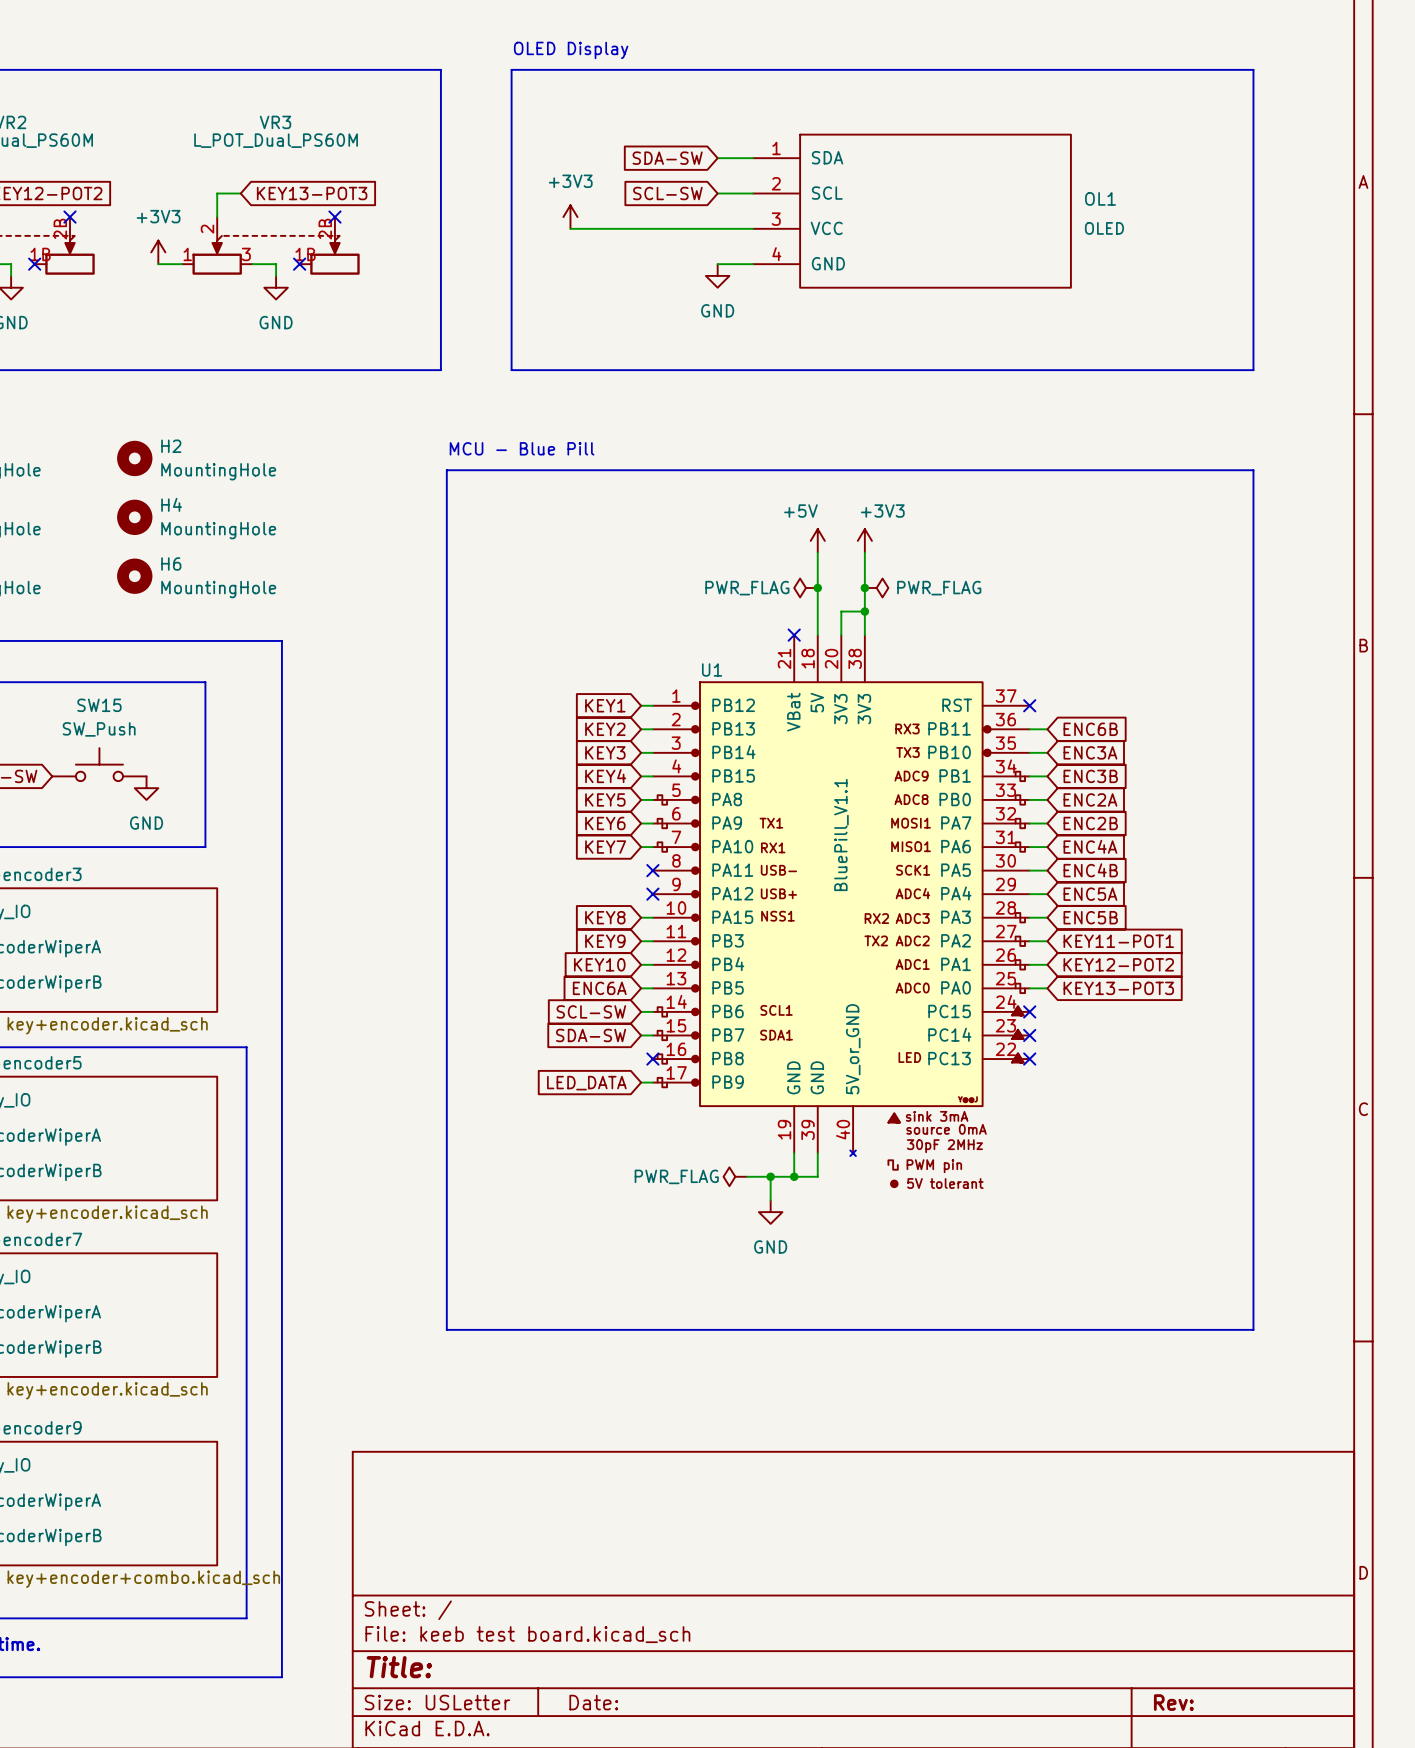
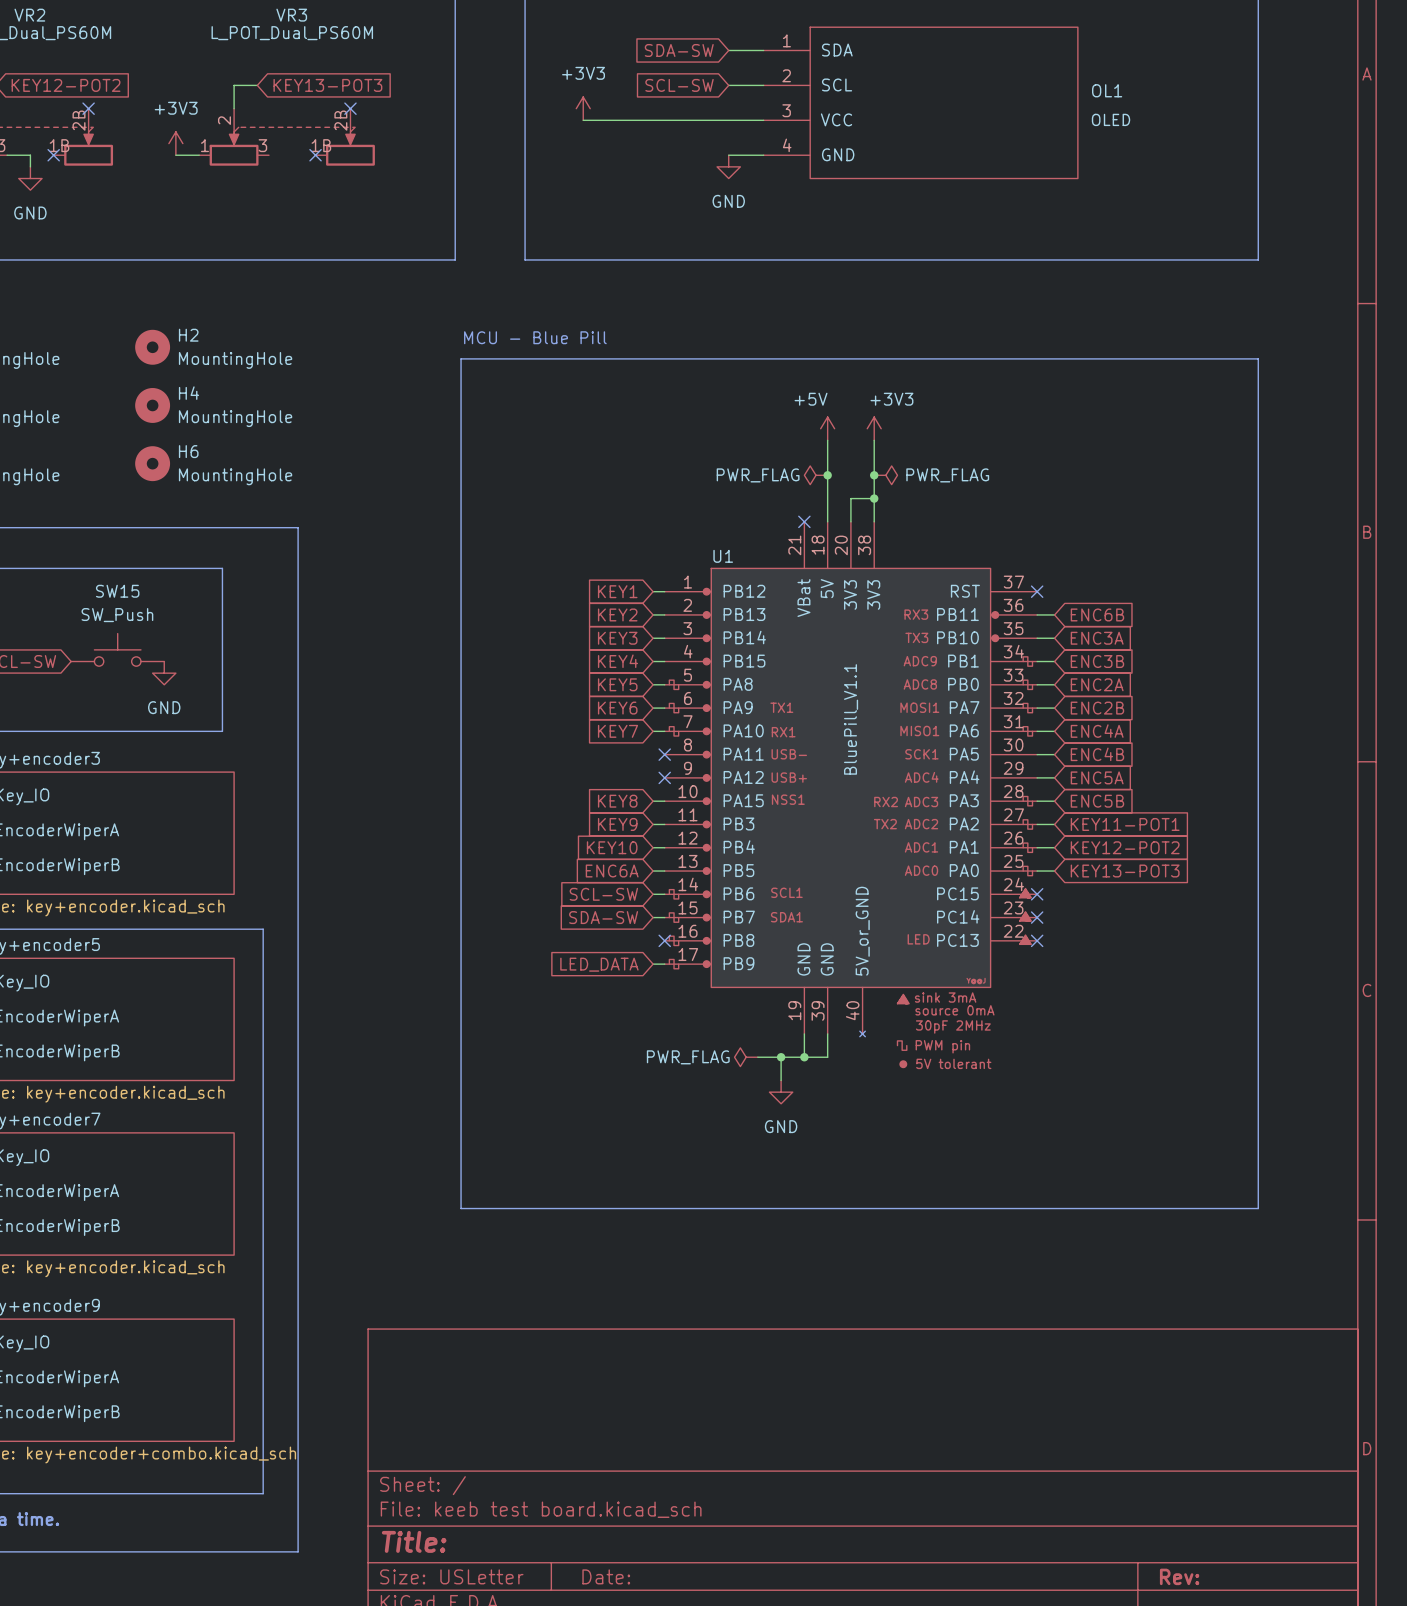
wire: (252, 264) (276, 264) (276, 275) -> none
power symbol: GND (276, 287) -> none

